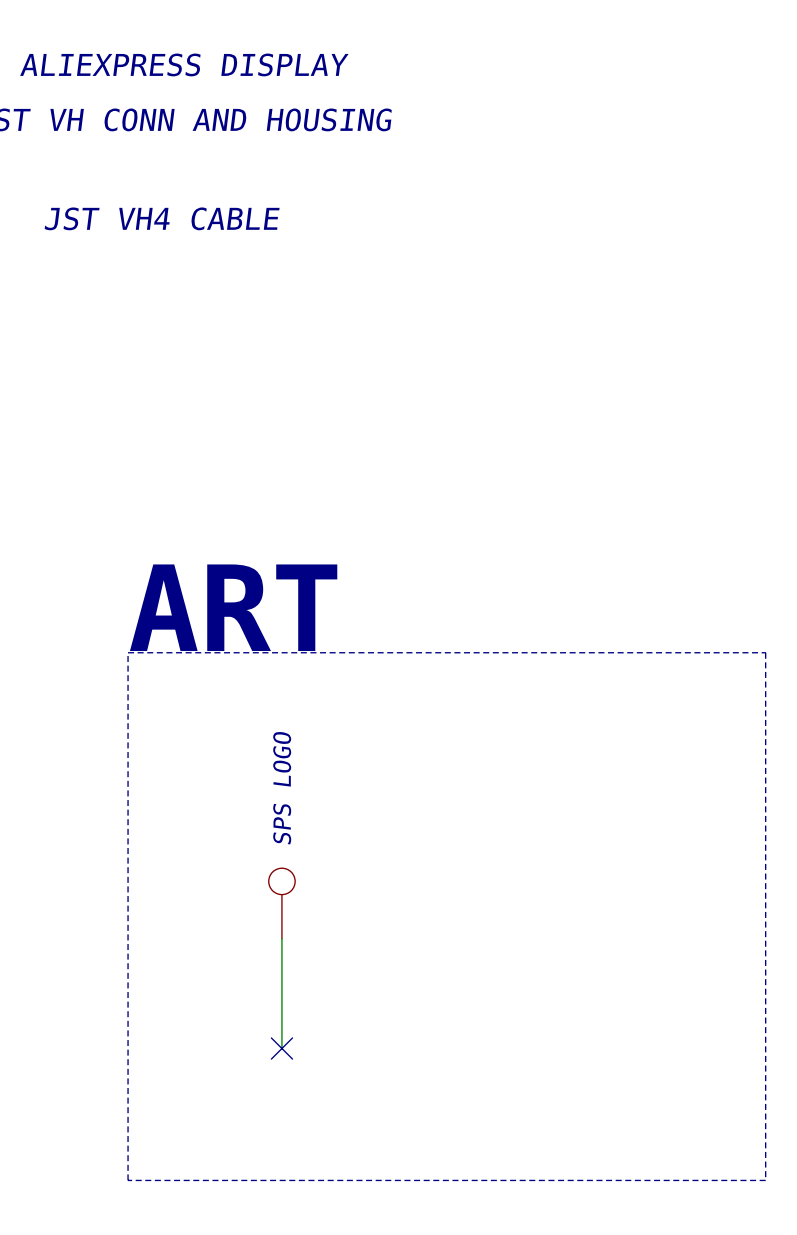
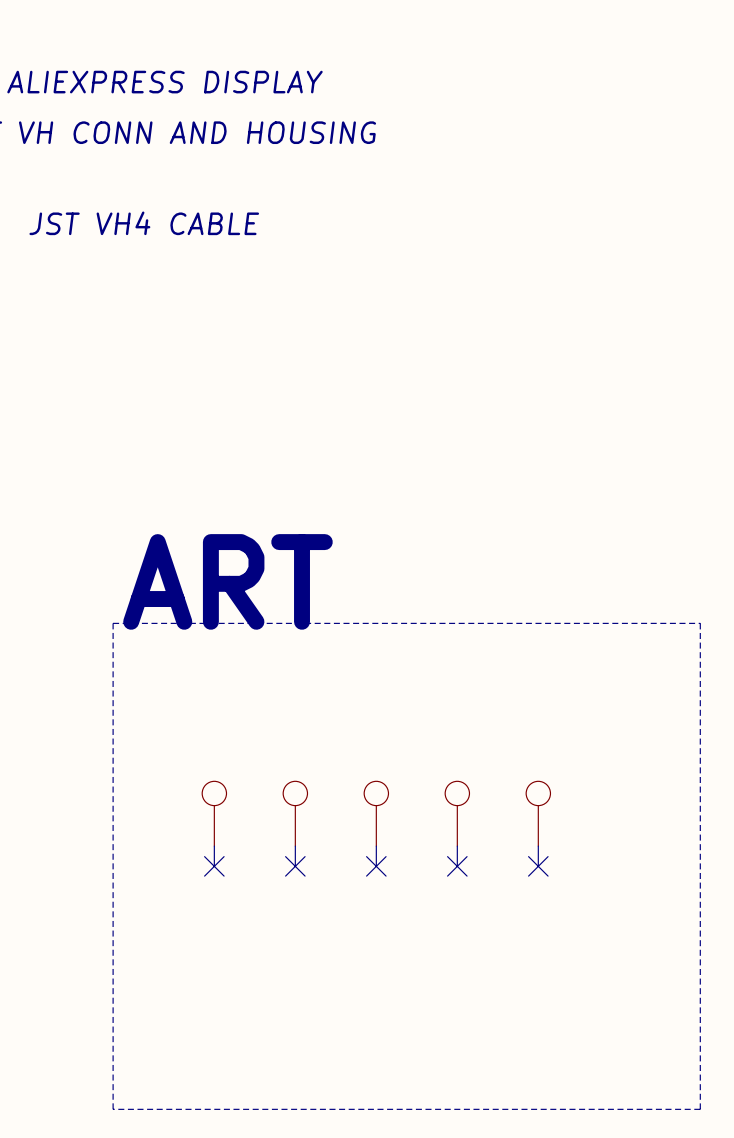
text: SPS LOGO (282, 788) -> none
part: none -> (214, 813)
part: none -> (295, 813)
part: none -> (376, 813)
part: none -> (457, 813)
part: none -> (538, 813)
wire: none -> (214, 846) (214, 866)
wire: none -> (295, 846) (295, 866)
wire: none -> (376, 846) (376, 866)
wire: none -> (457, 846) (457, 866)
wire: none -> (538, 846) (538, 866)
part: (281, 903) -> none
no-connect mark: none -> (214, 866)
no-connect mark: none -> (295, 866)
no-connect mark: none -> (376, 866)
no-connect mark: none -> (457, 866)
no-connect mark: none -> (538, 866)
wire: (281, 938) (281, 1048) -> none
no-connect mark: (281, 1048) -> none

